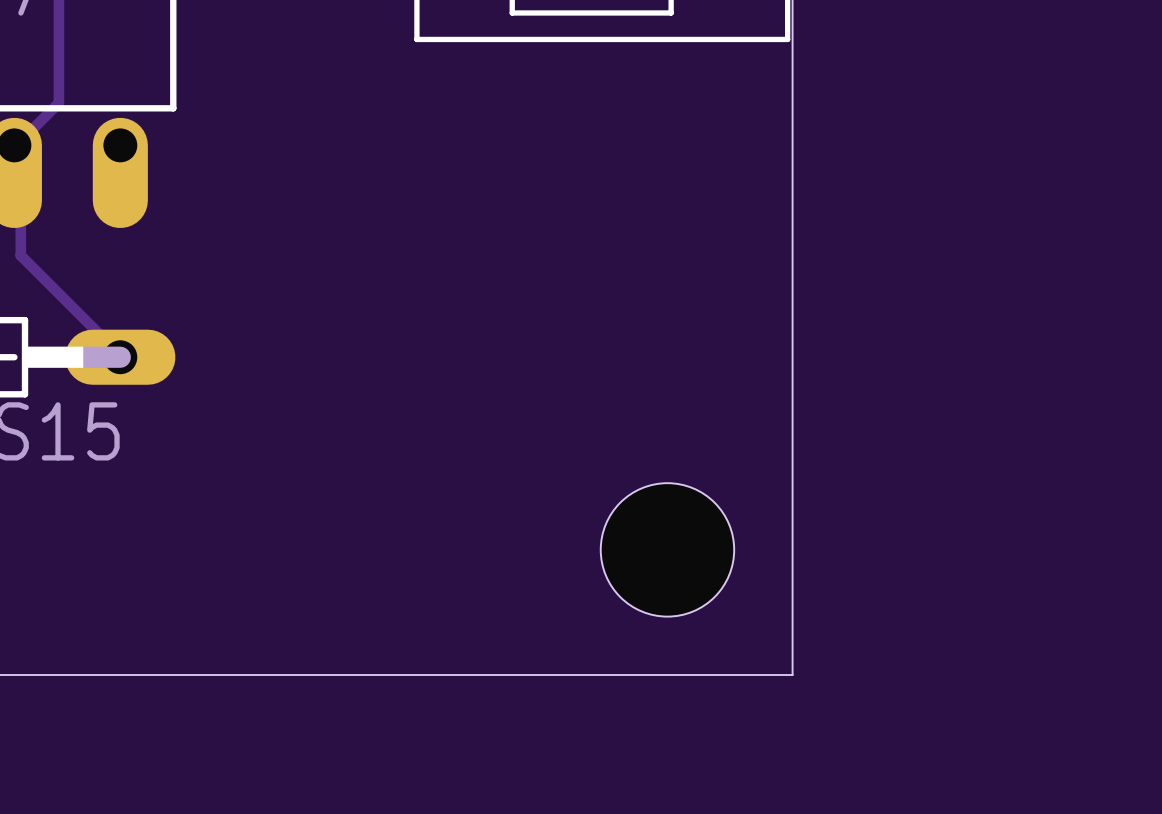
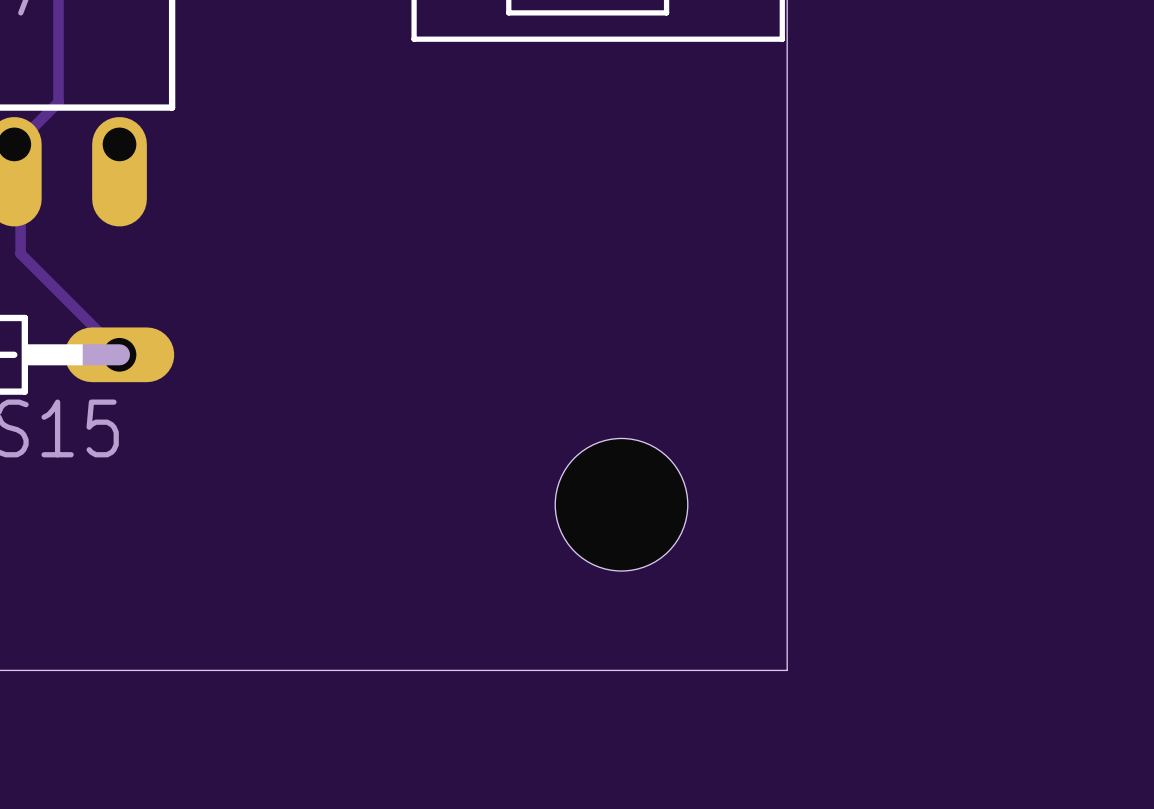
hole position: (667, 549) -> (621, 504)

